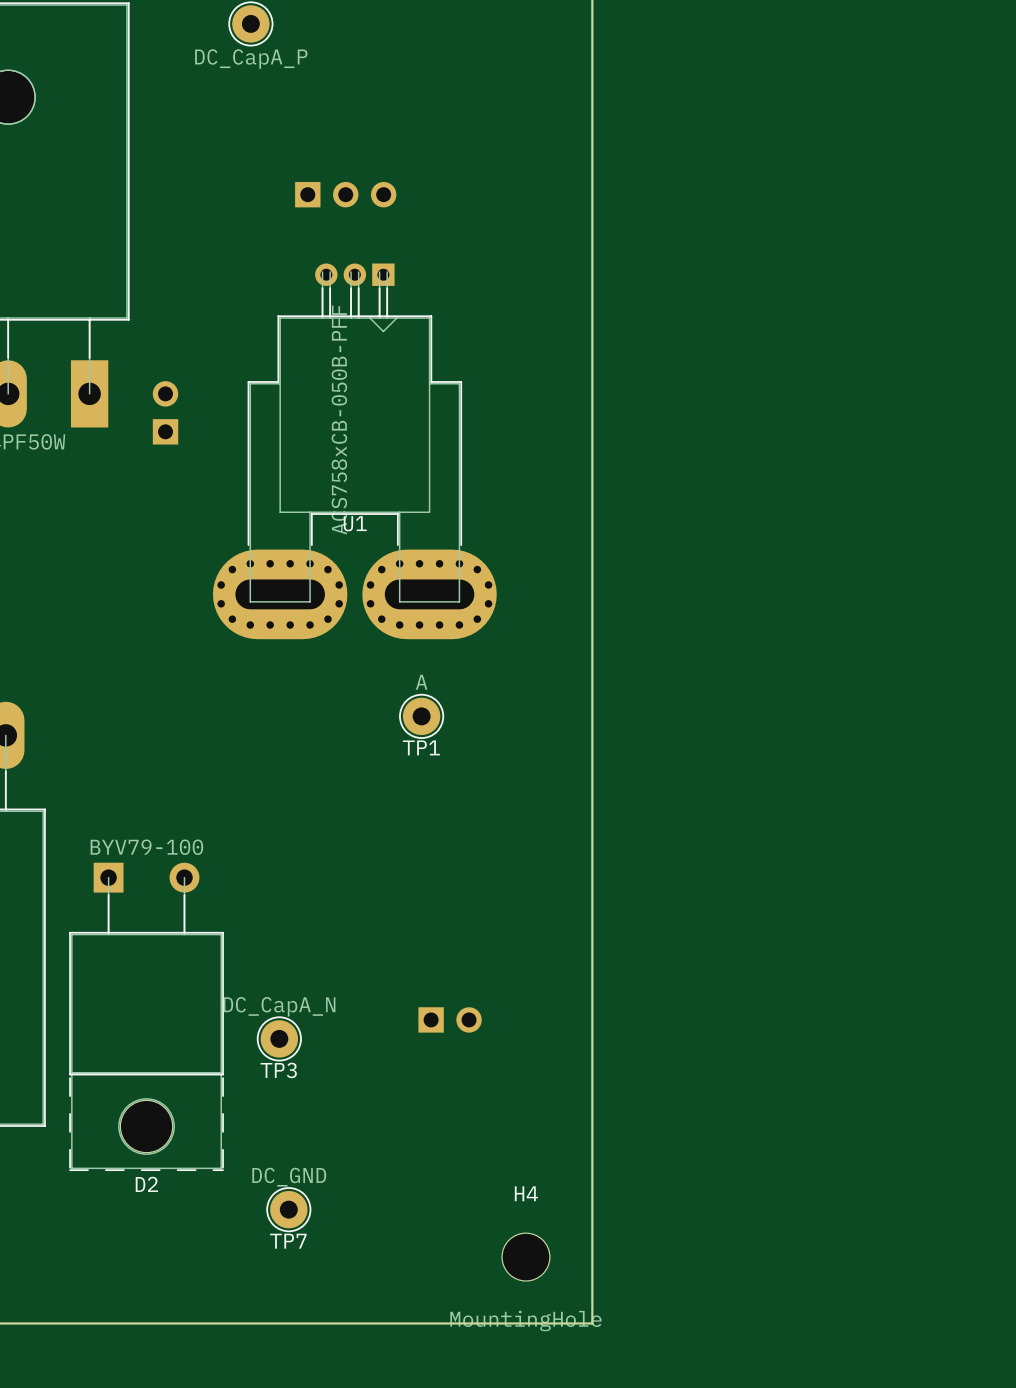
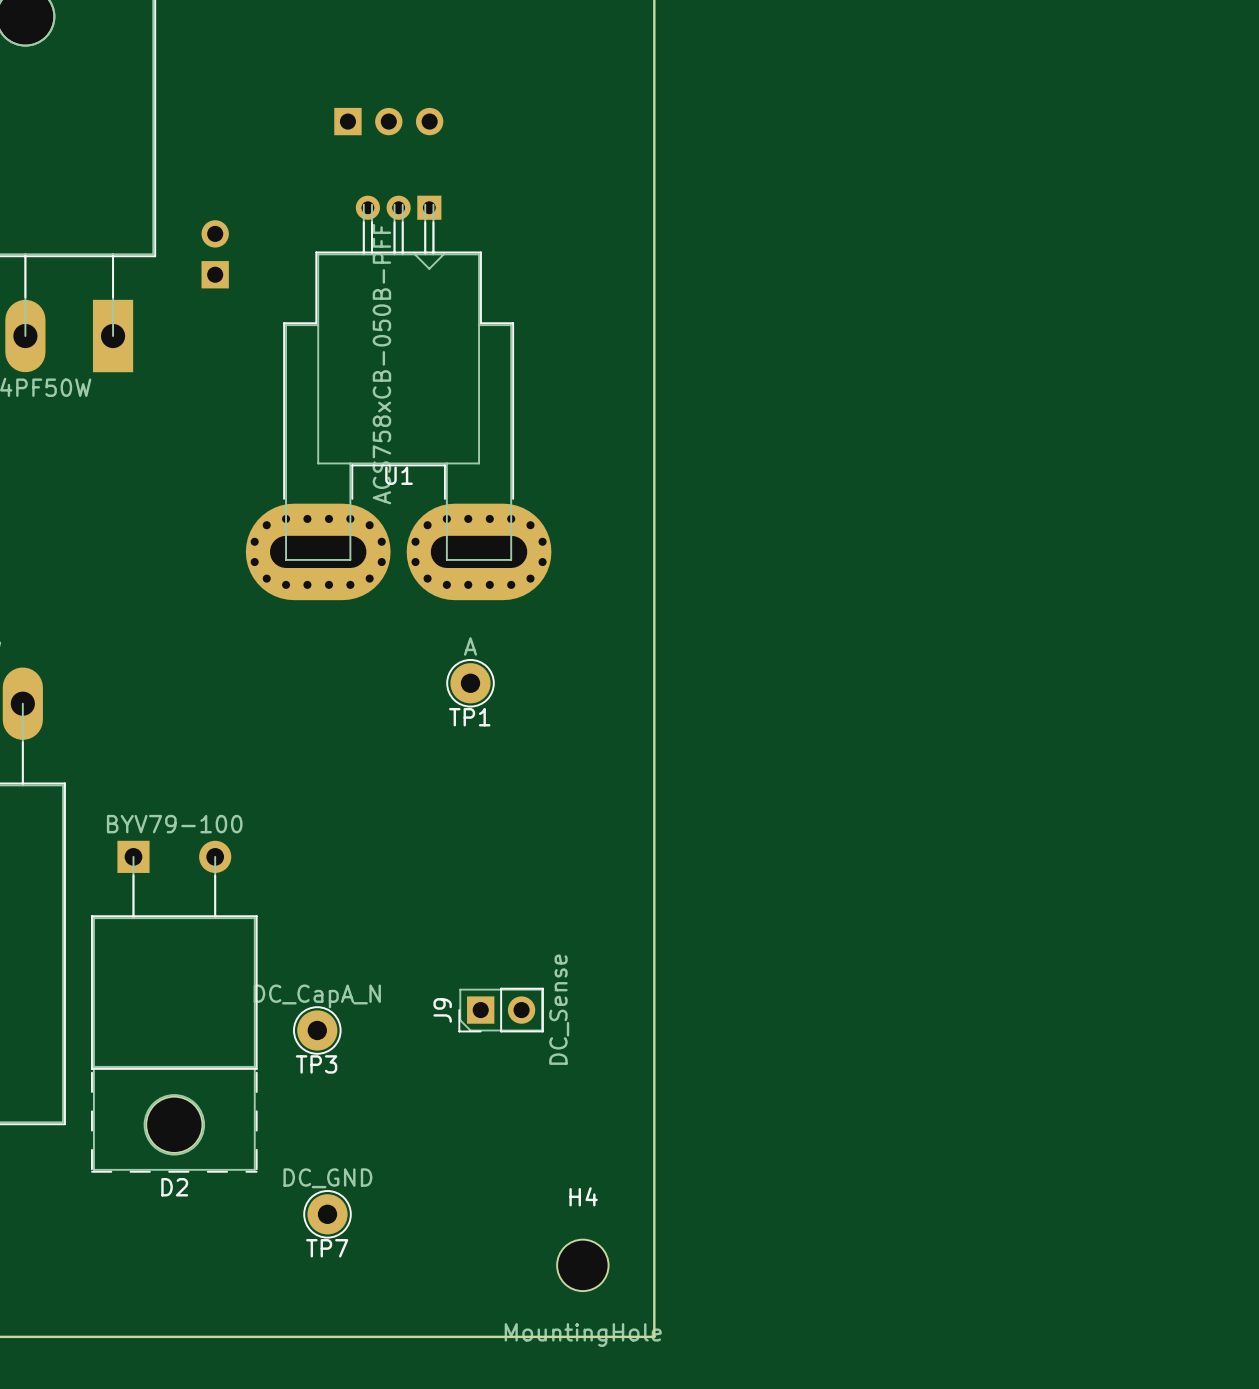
part position: (165, 412) -> (215, 254)
J9 side: bottom (450, 1019) -> top (501, 1010)

